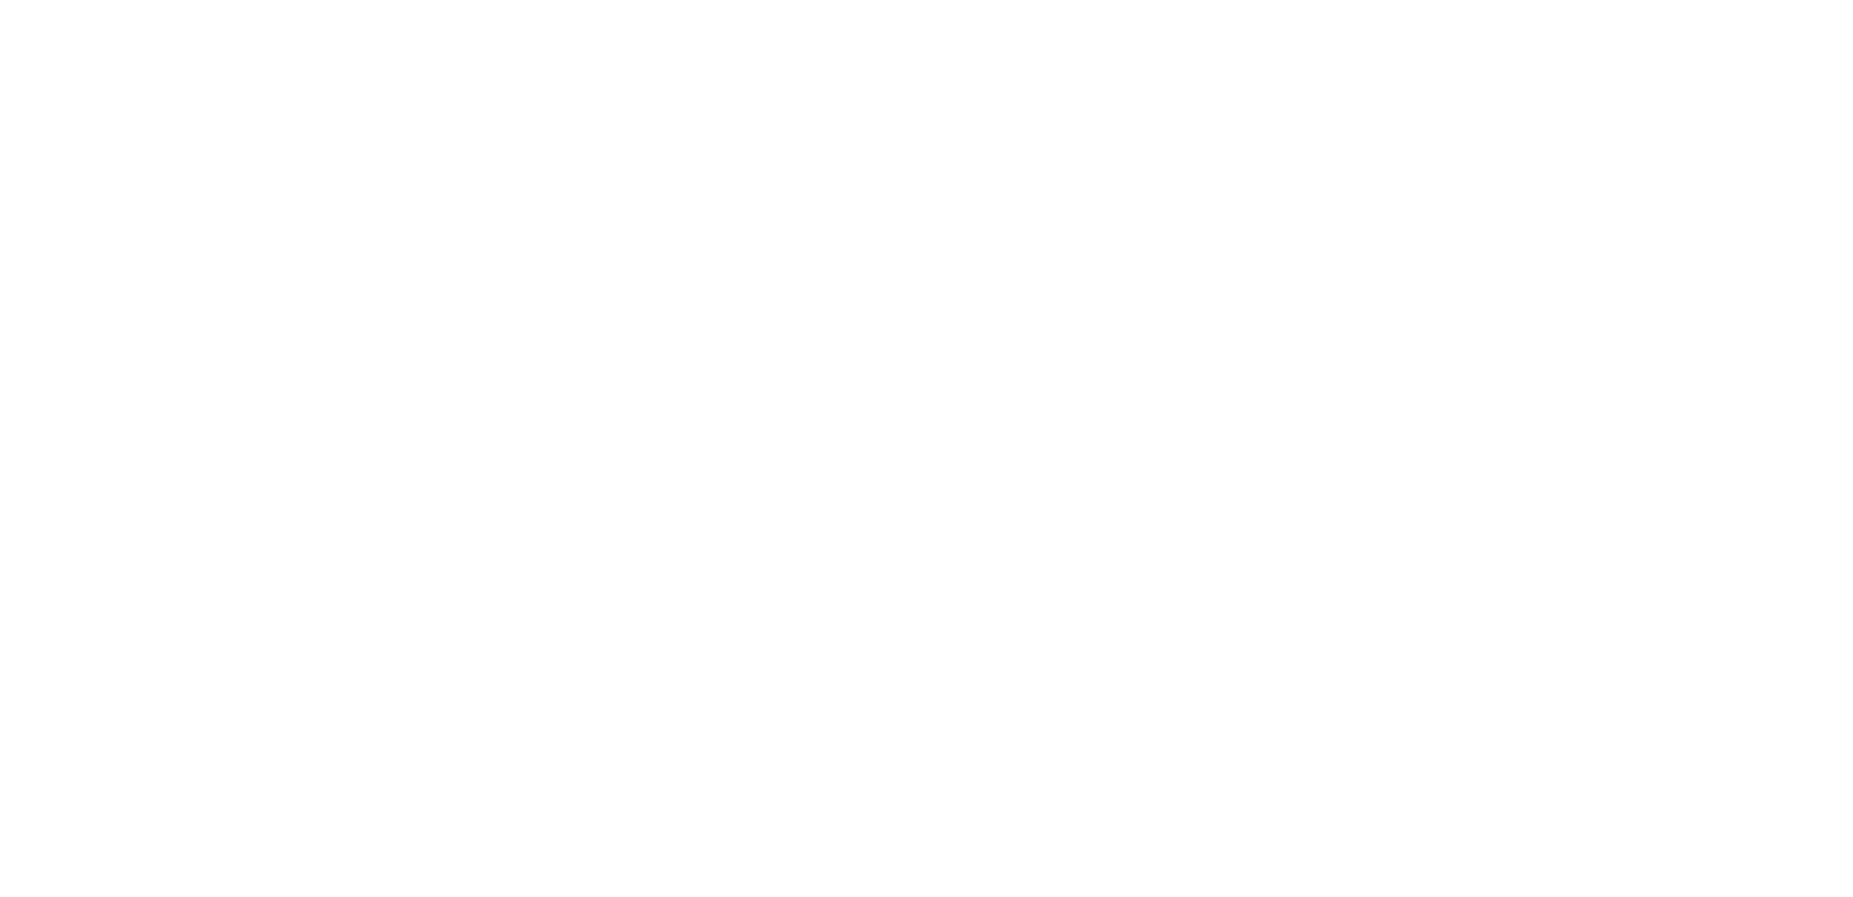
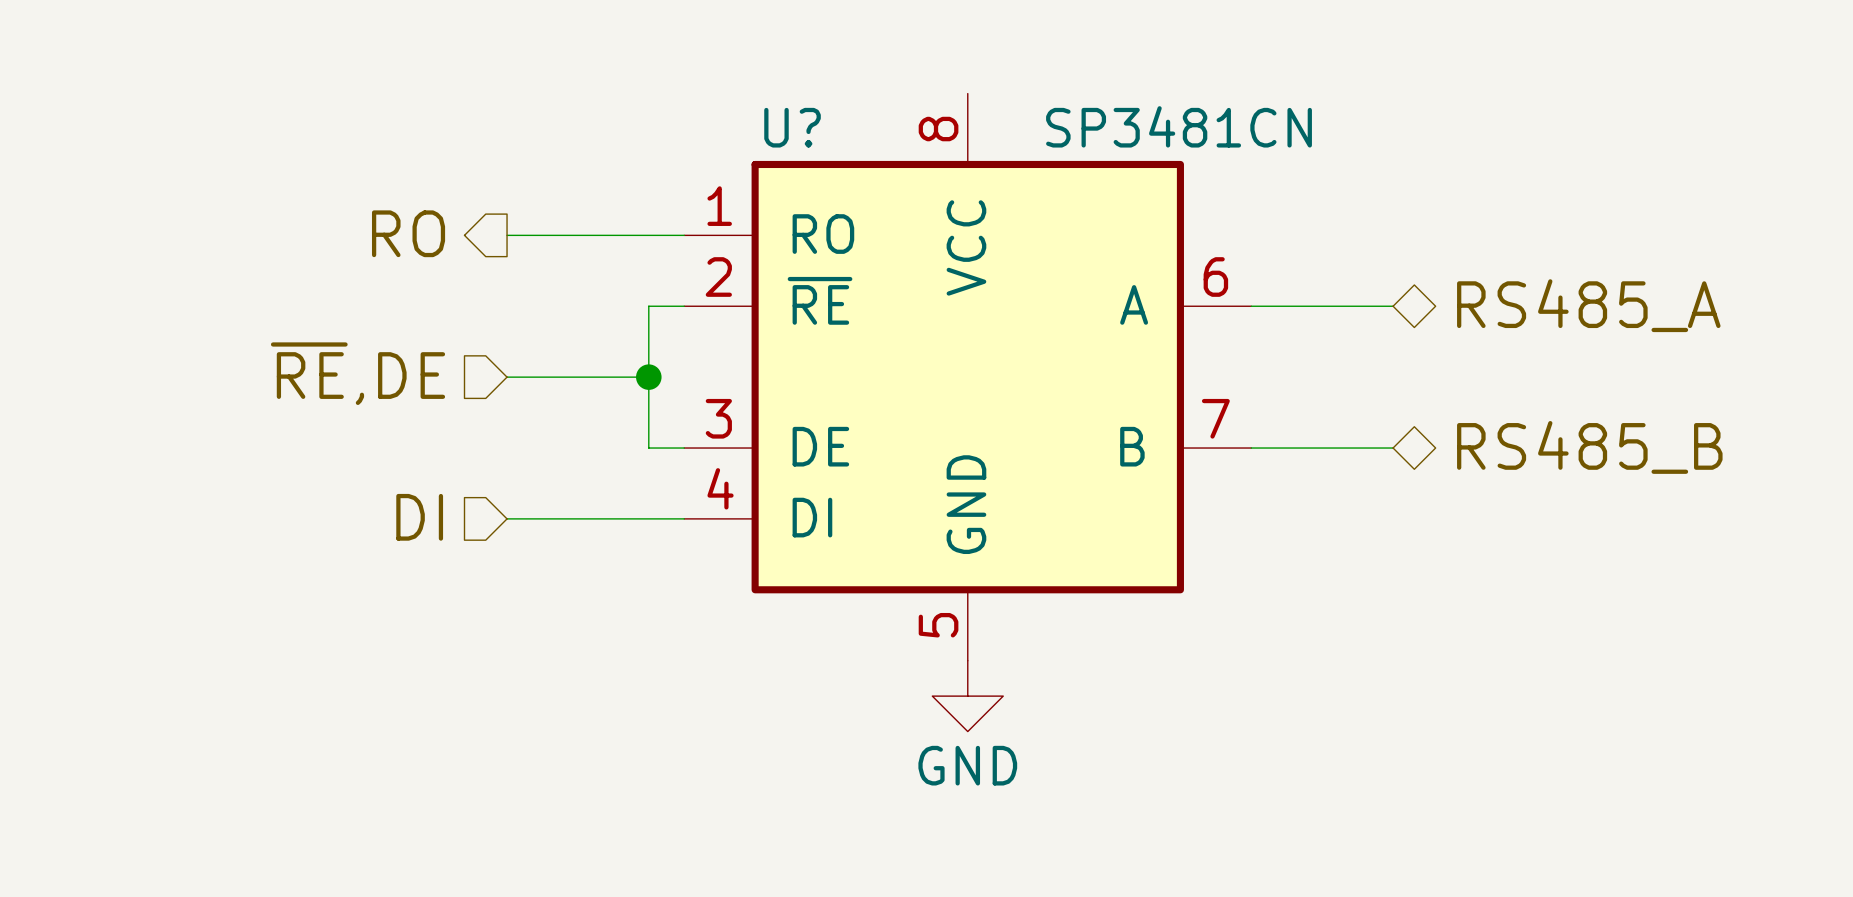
hierarchical label: none -> RO (408, 233)
wire: none -> (507, 235) (684, 235)
hierarchical label: none -> RS485_A (1588, 305)
wire: none -> (684, 306) (648, 306) (648, 448) (684, 448)
wire: none -> (1251, 306) (1393, 306)
hierarchical label: none -> ~{RE},DE (358, 373)
wire: none -> (507, 377) (648, 377)
junction: none -> (648, 377)
U?: none -> SP3481CN (967, 377)
hierarchical label: none -> RS485_B (1589, 447)
wire: none -> (1251, 448) (1393, 448)
hierarchical label: none -> DI (419, 517)
wire: none -> (507, 518) (684, 518)
power symbol: none -> GND (967, 696)

